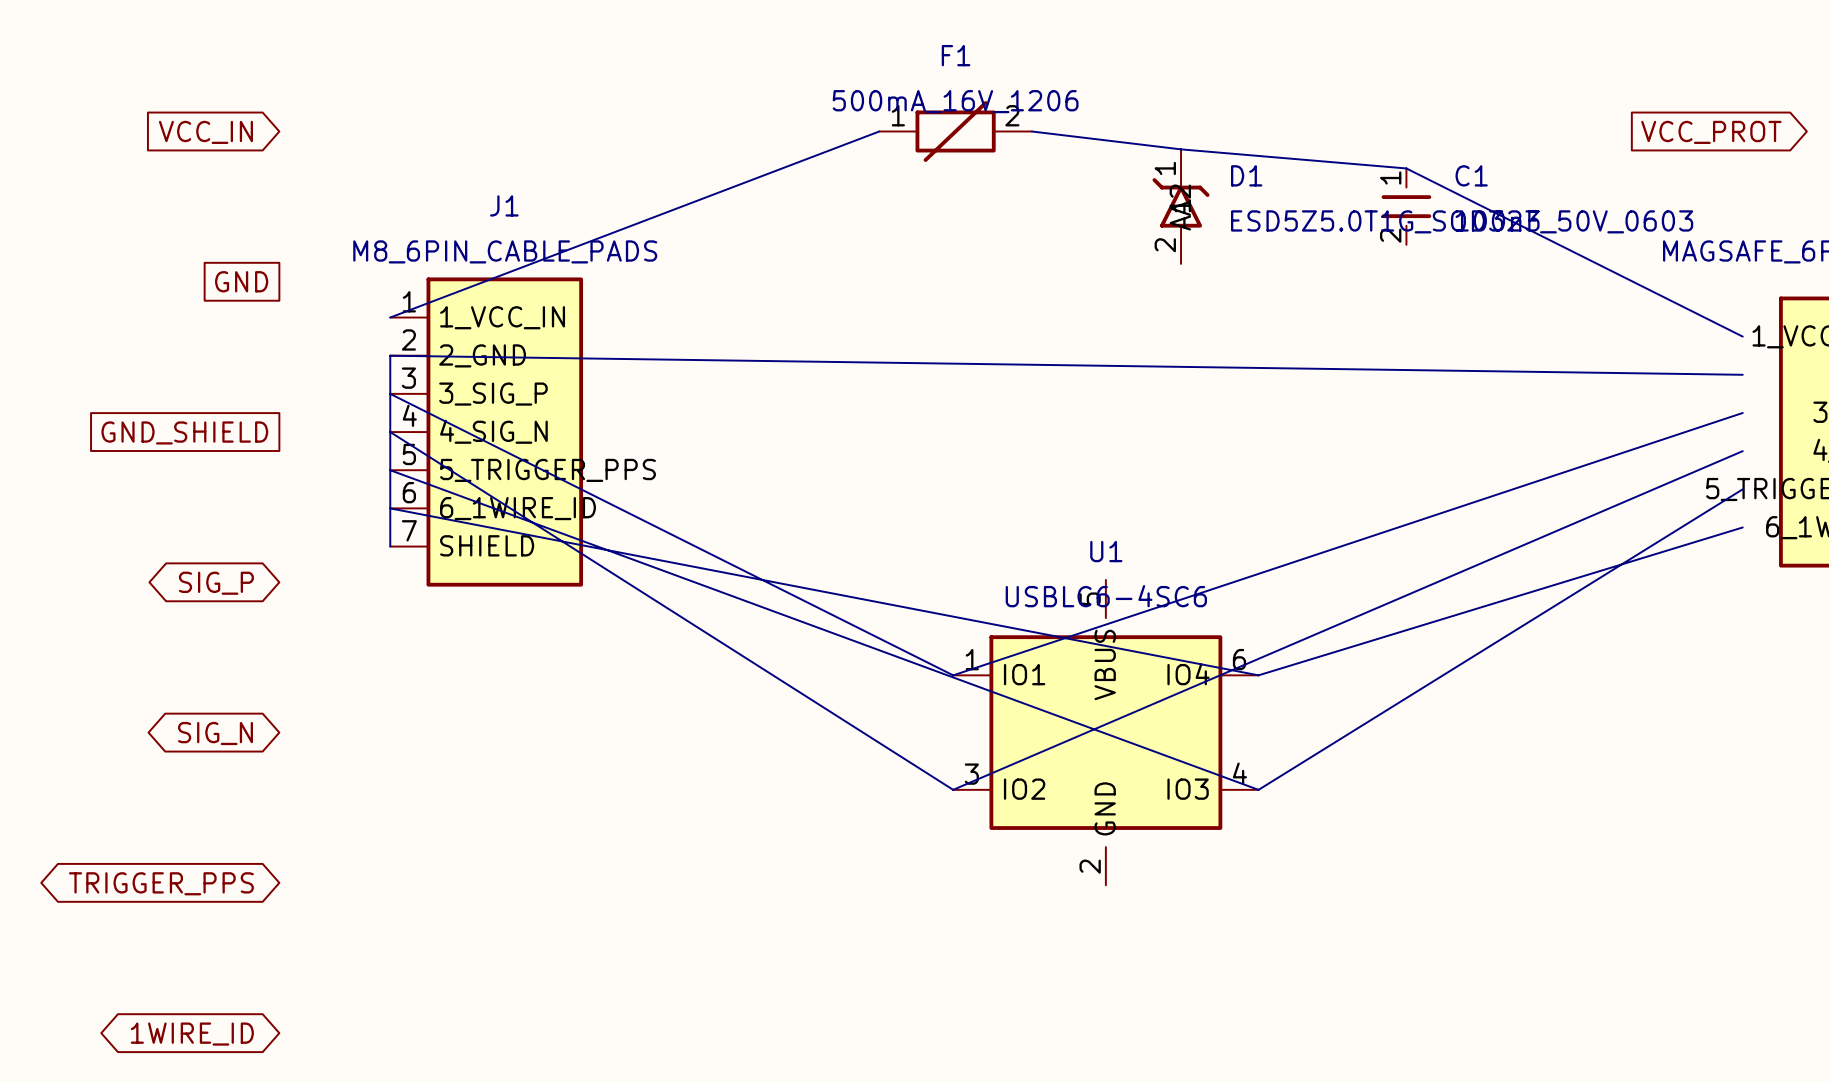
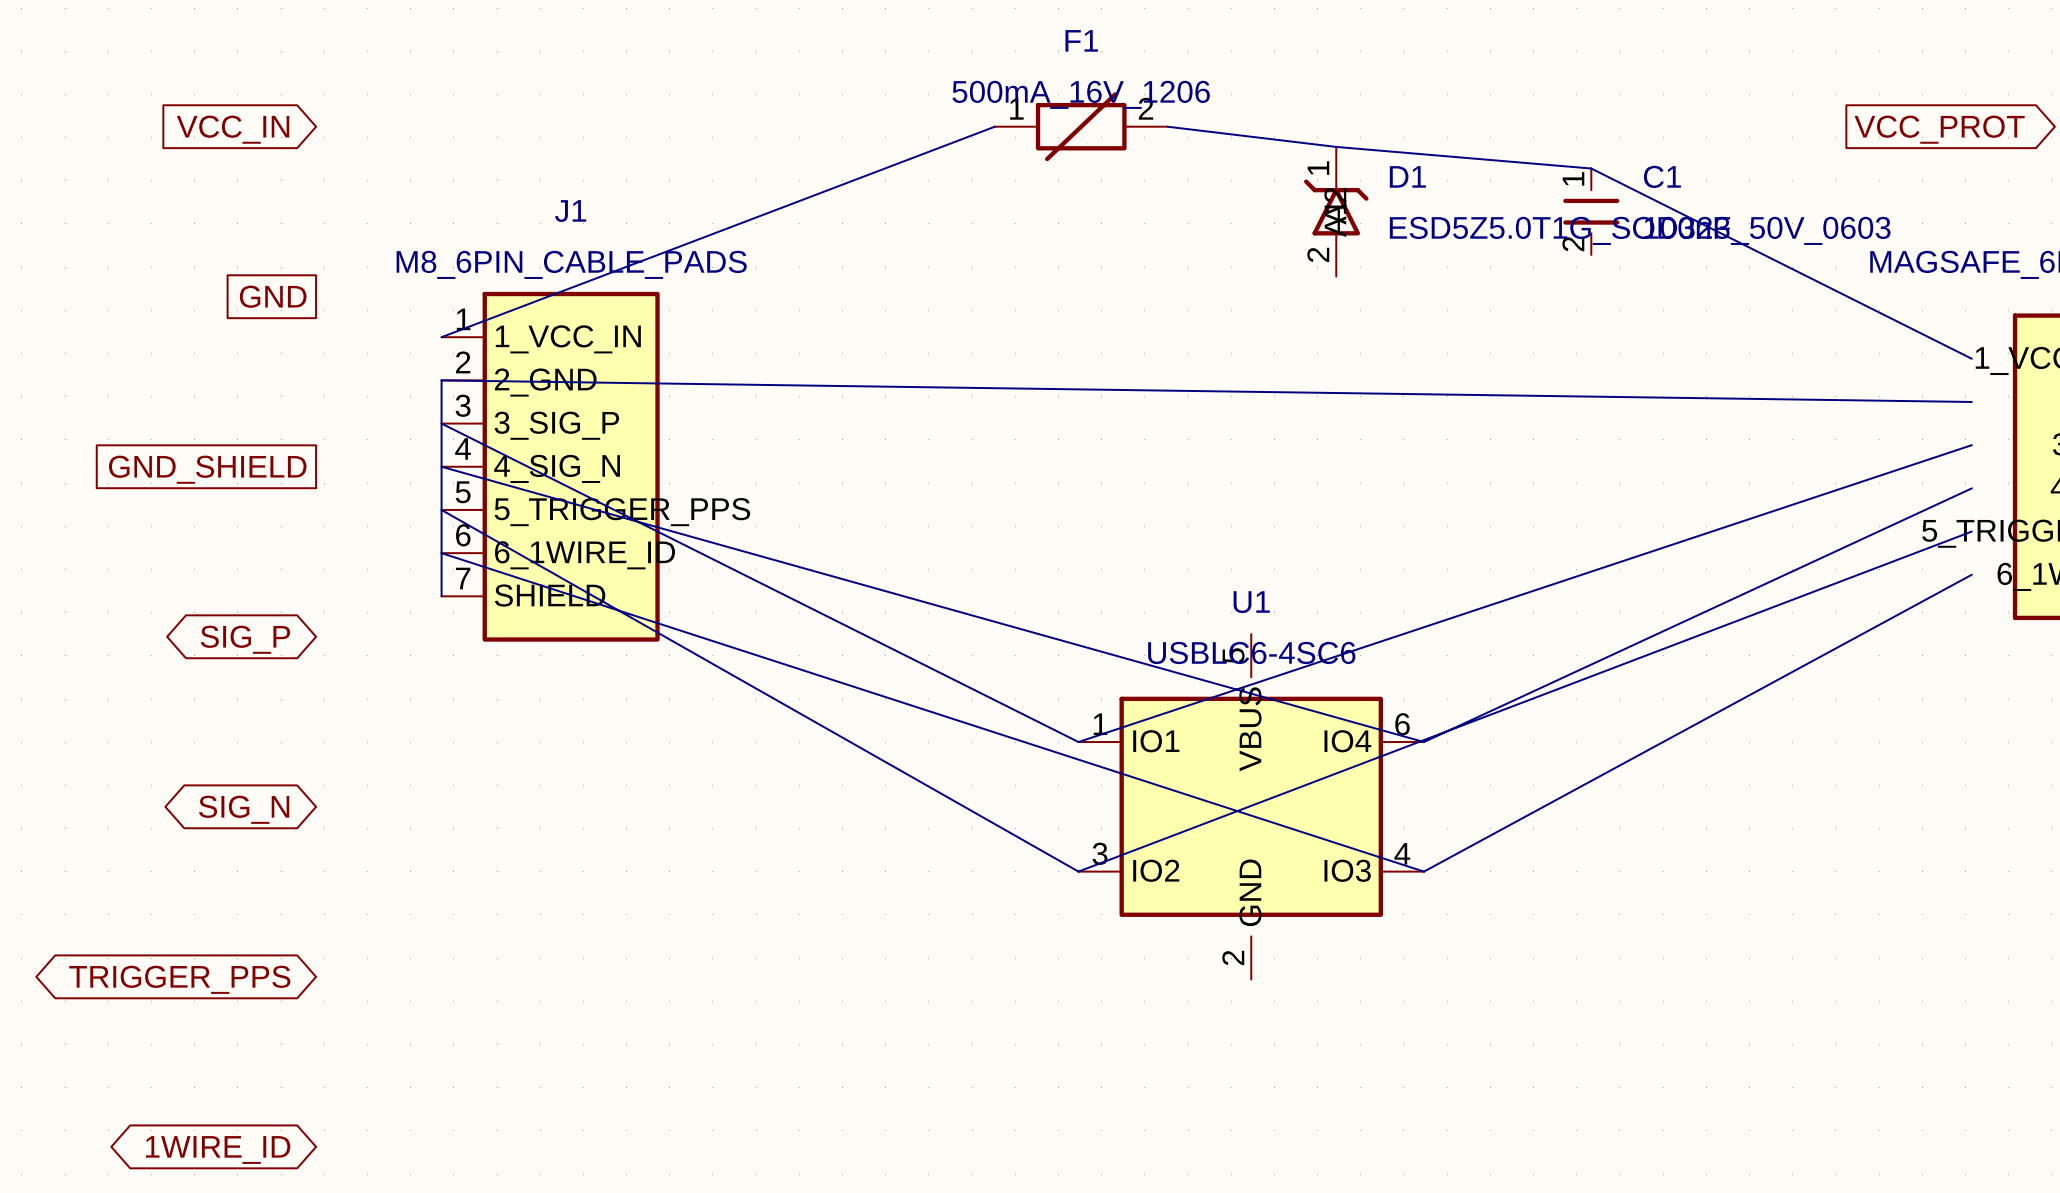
wire: (390, 432) (953, 789) (1742, 451) -> (441, 466) (1424, 742) (1971, 488)
wire: (390, 470) (1258, 789) (1742, 489) -> (441, 509) (1078, 871) (1971, 531)
wire: (390, 508) (1258, 675) (1742, 527) -> (441, 553) (1424, 871) (1971, 574)

